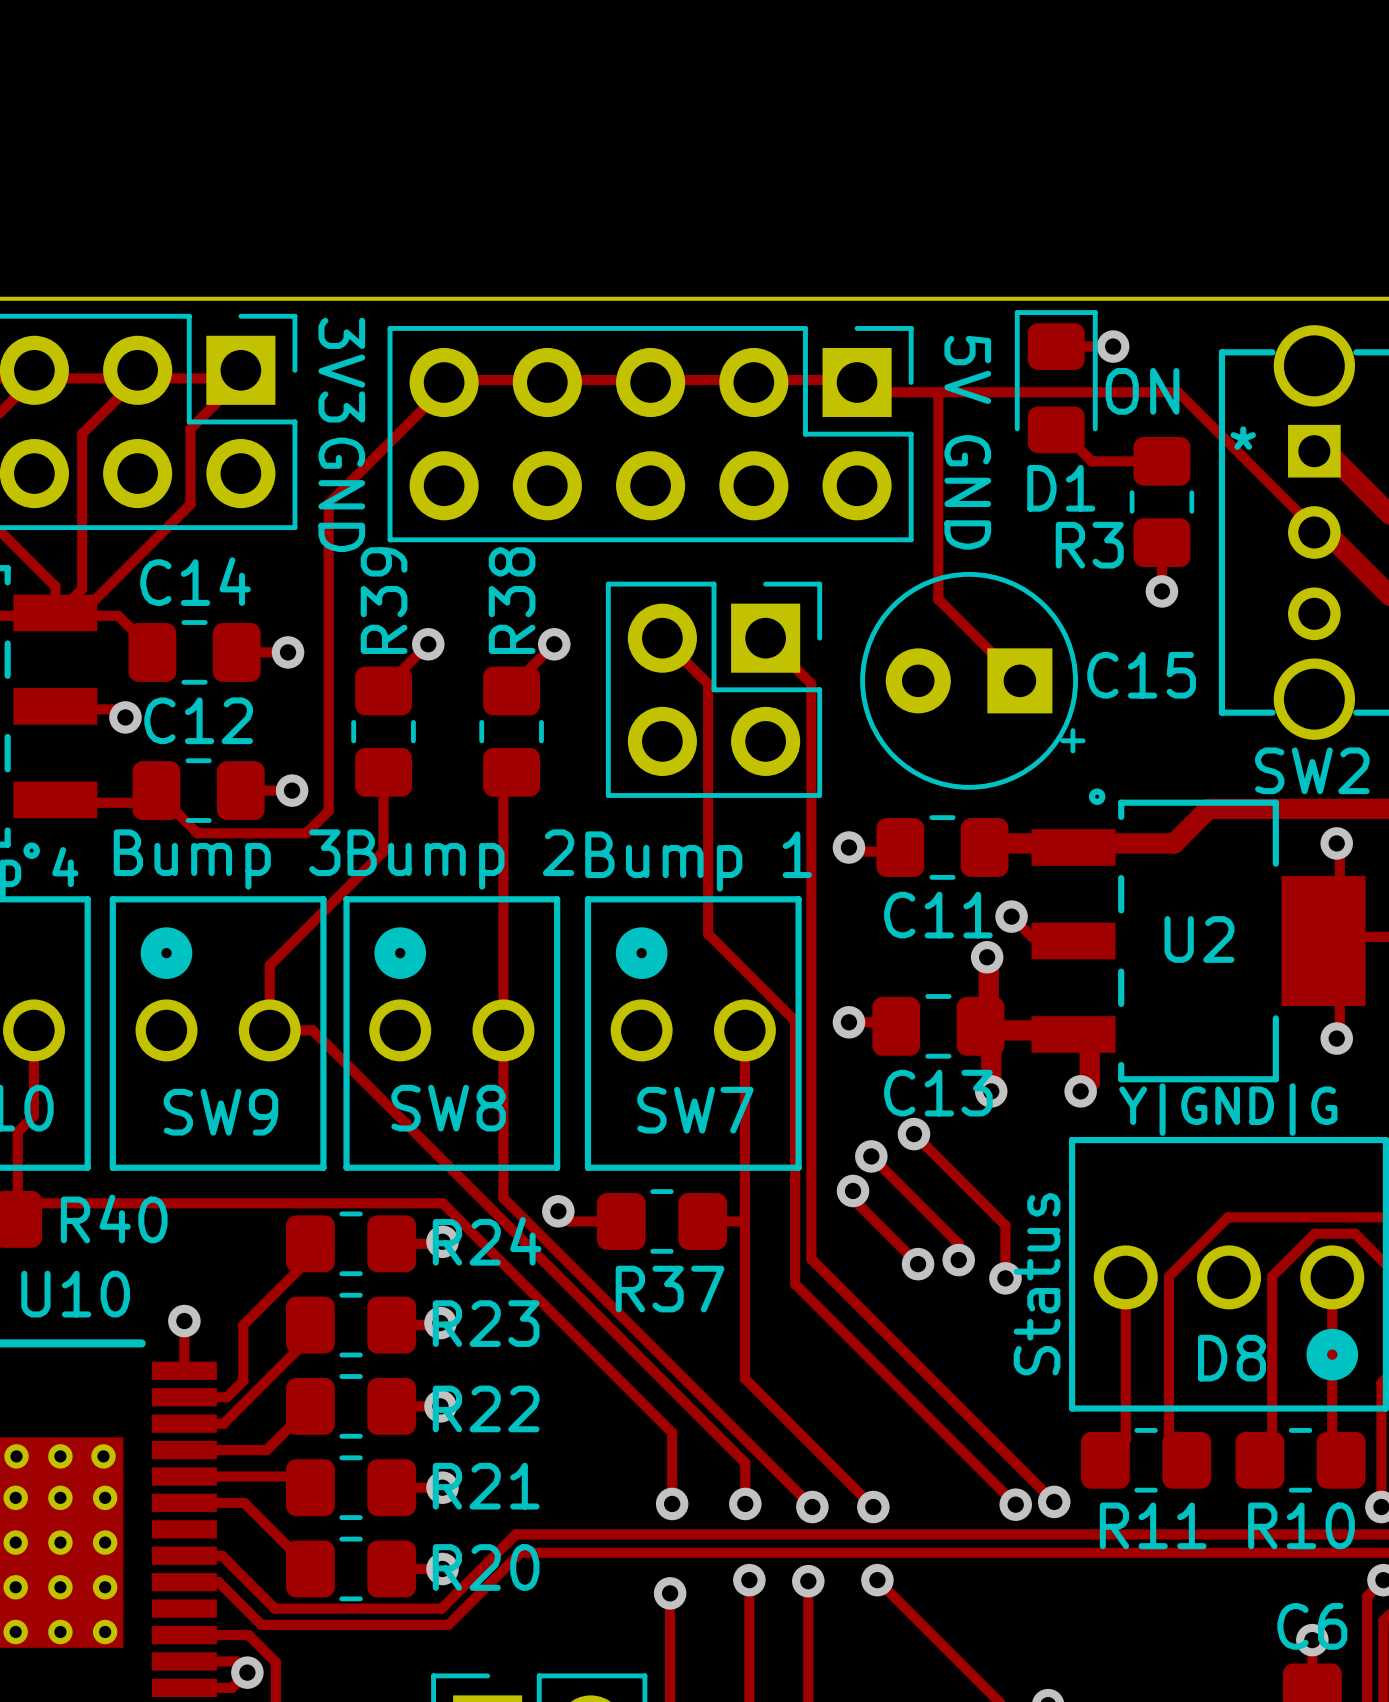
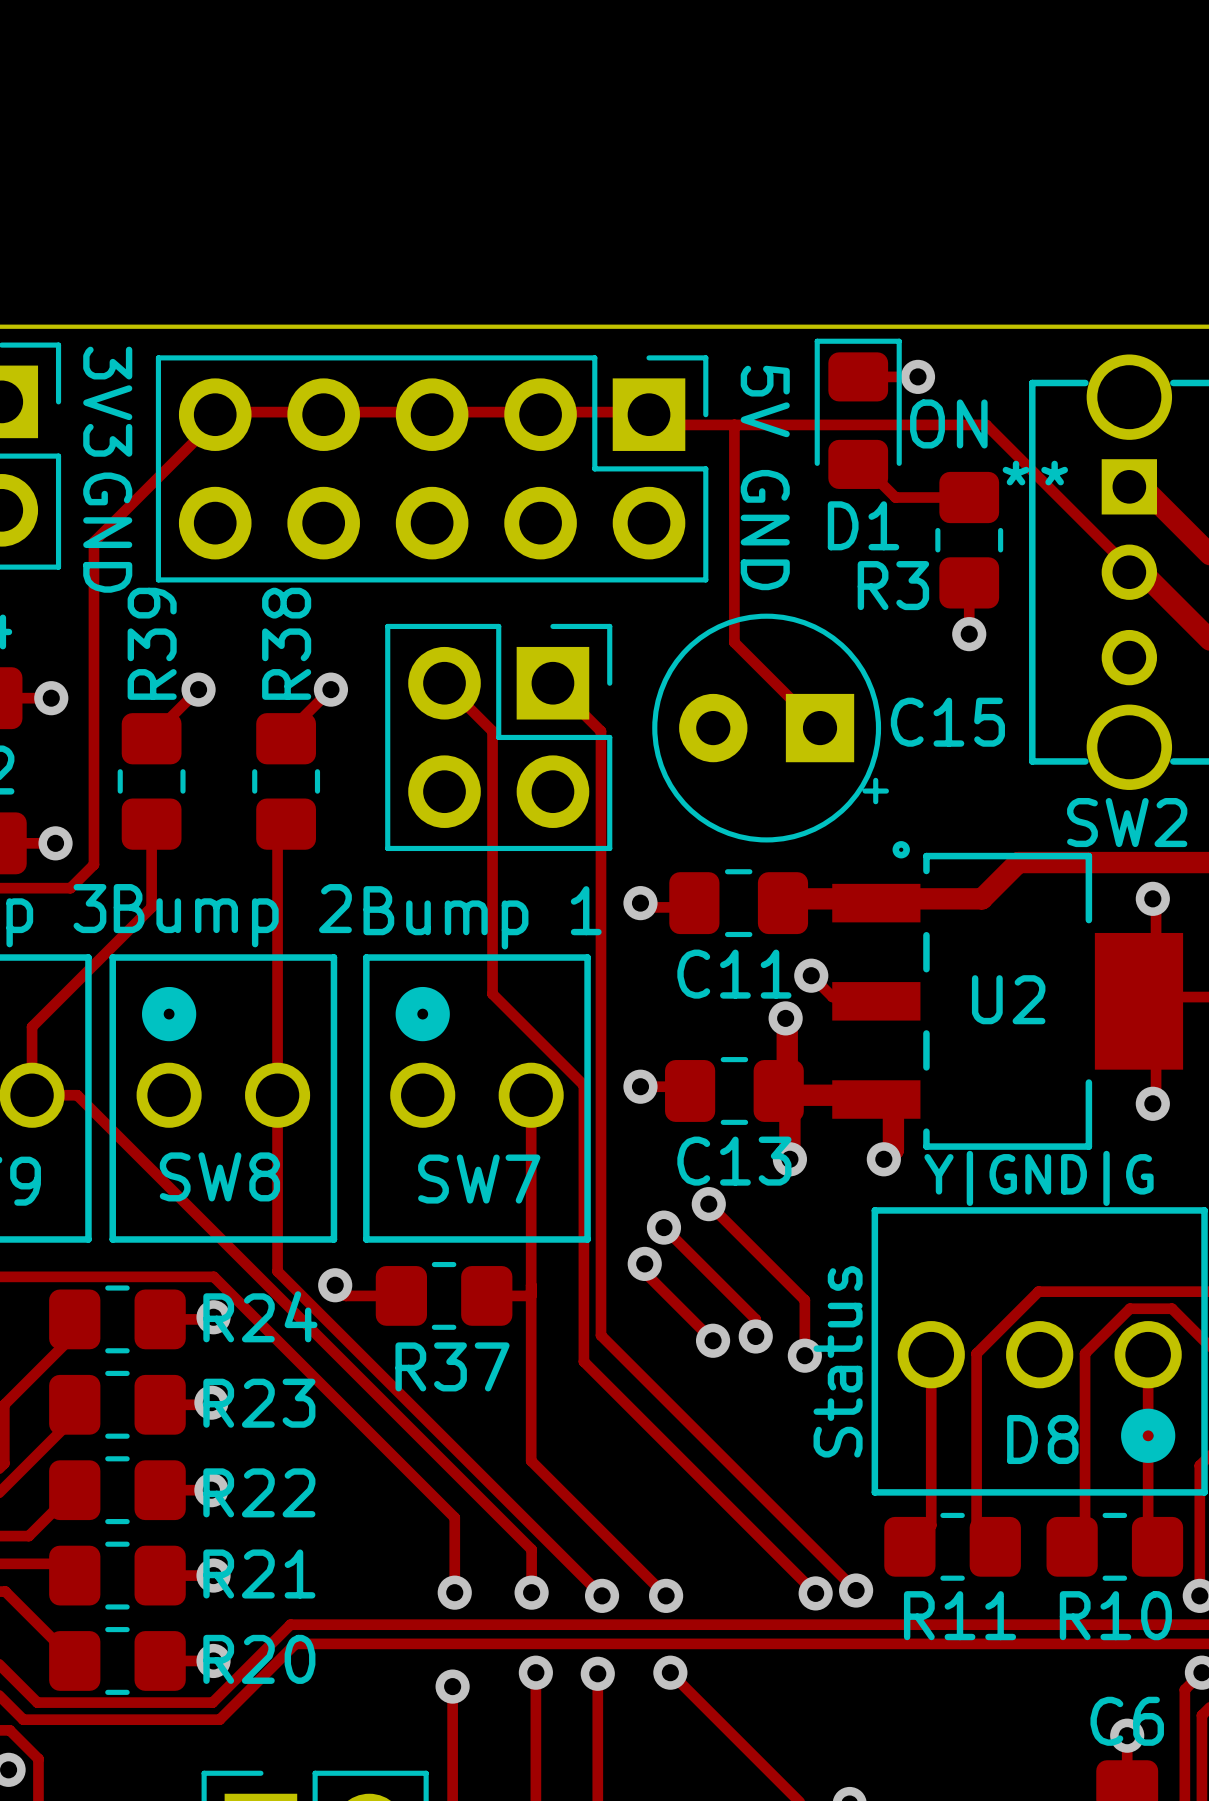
SW2 text: none -> * (1016, 473)

